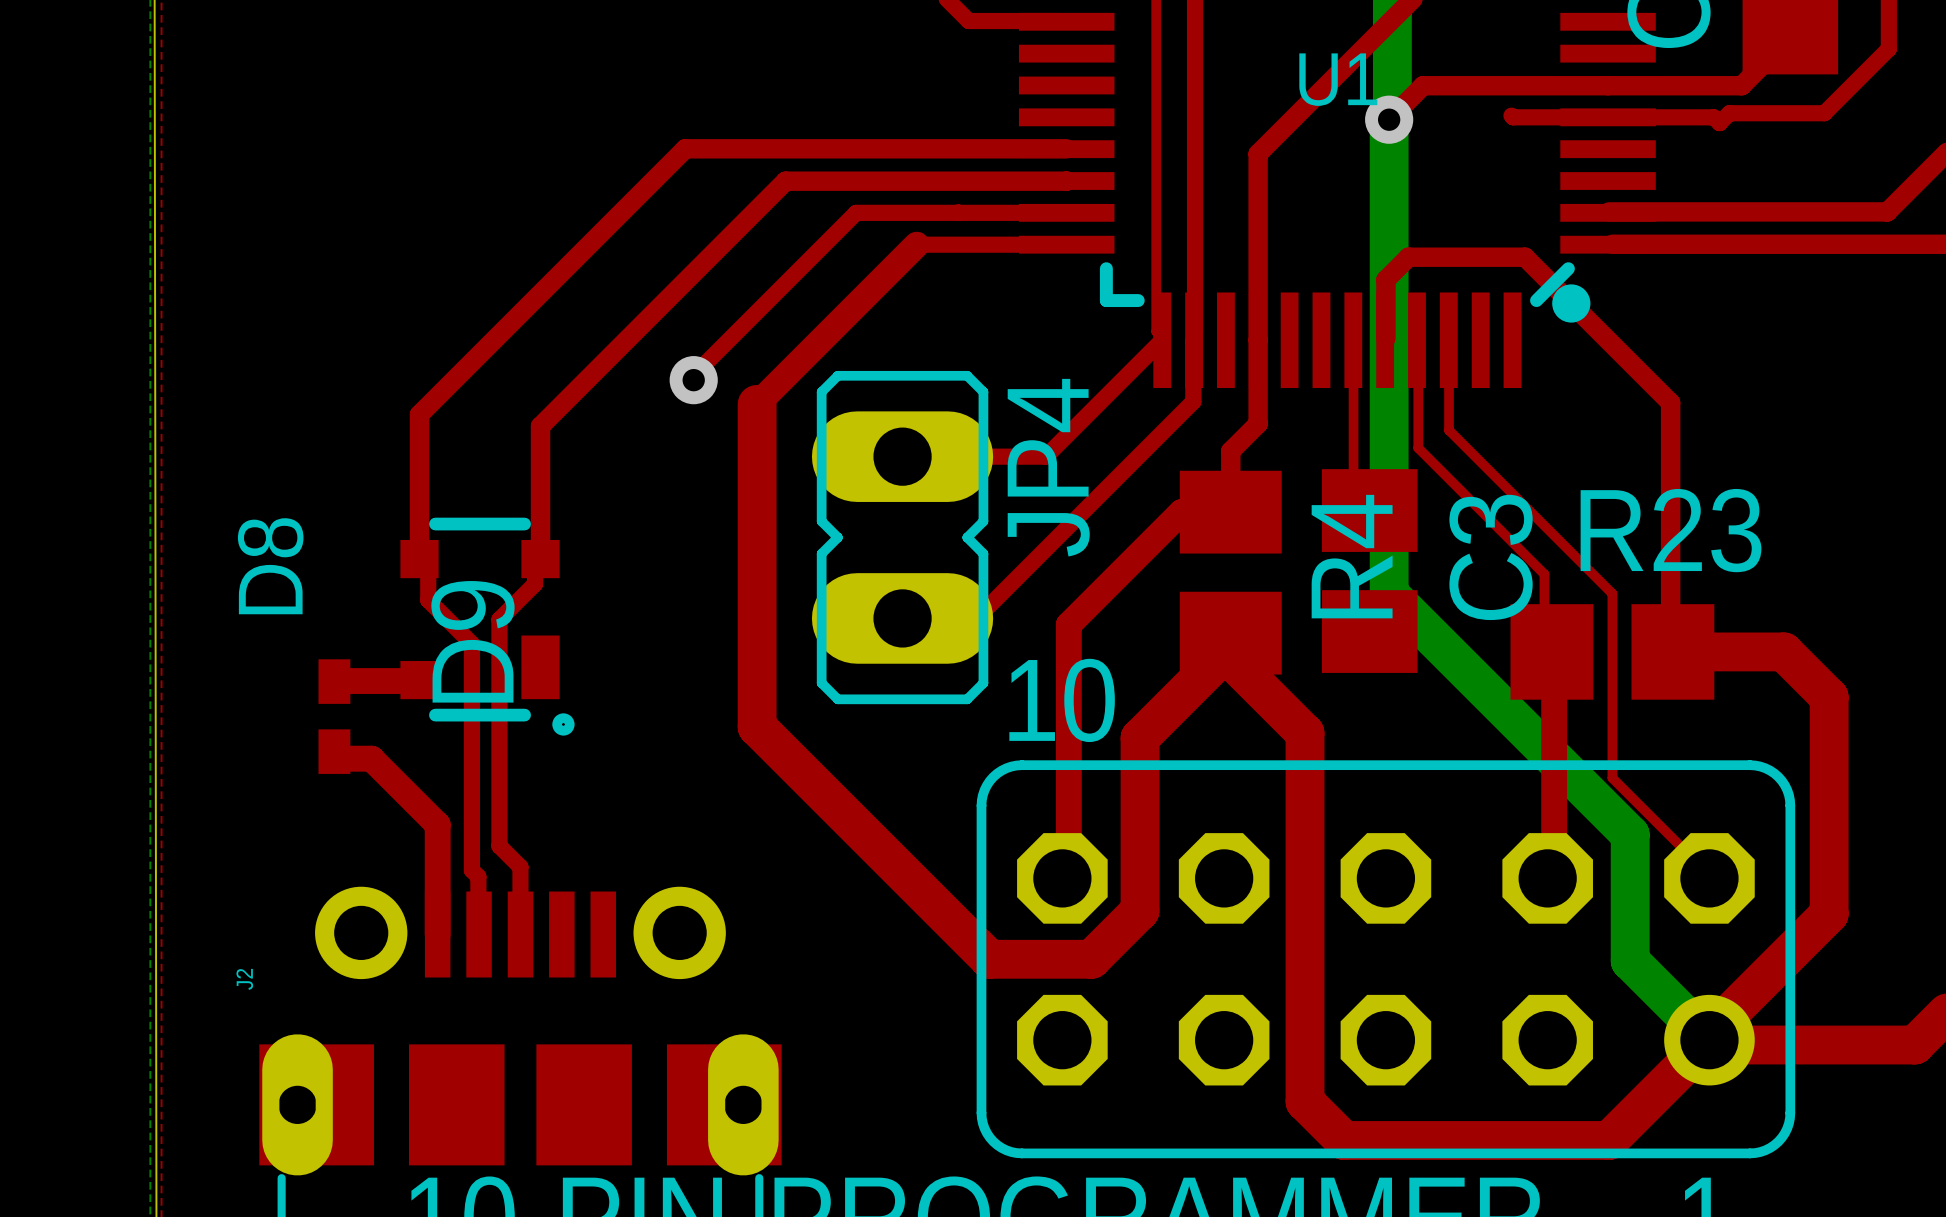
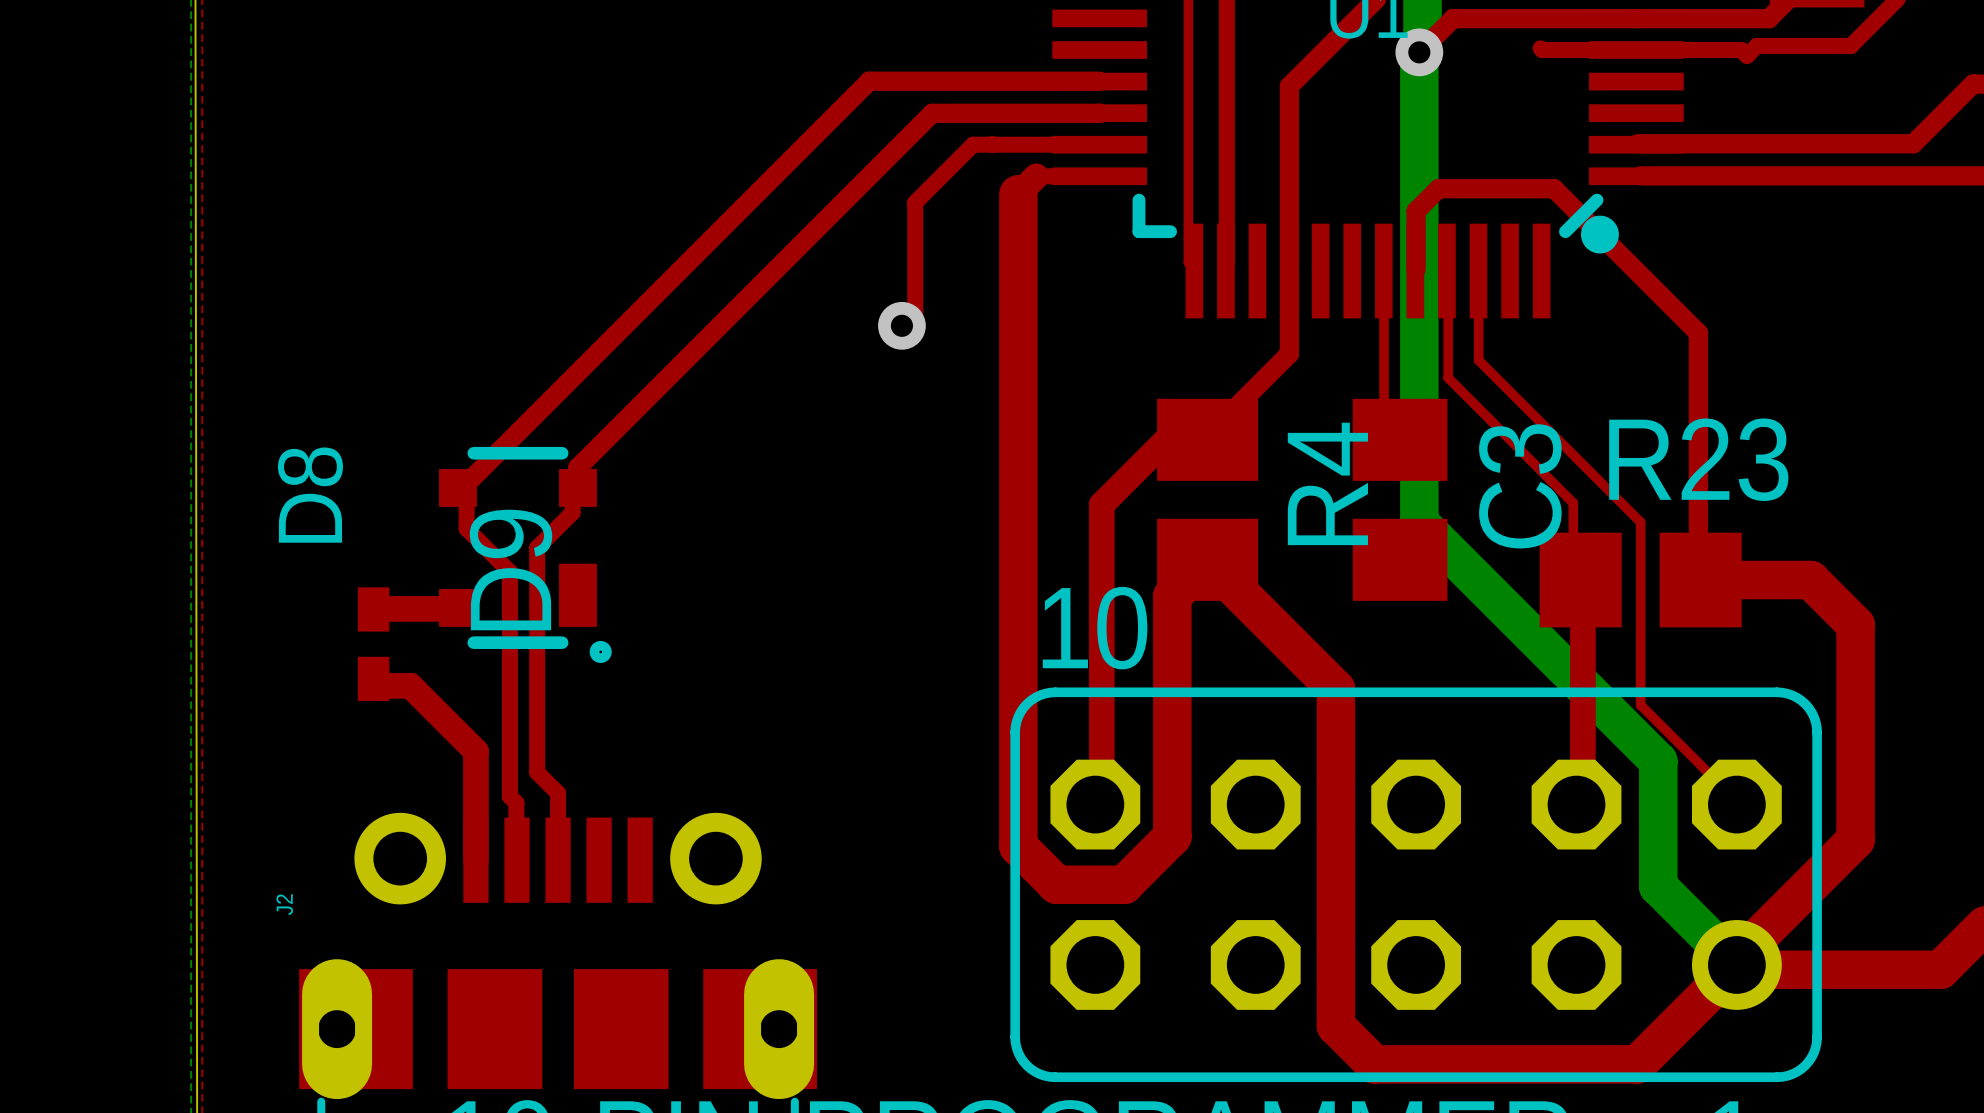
top track: (834, 148) (685, 148) (419, 414) (419, 559) -> (869, 81) (466, 483) (457, 487)
top track: (897, 181) (785, 181) (540, 426) (540, 538) -> (932, 113) (577, 467)
top track: (939, 212) (856, 212) (693, 375) (693, 380) -> (973, 144) (915, 202) (915, 312) (901, 325)
top track: (1002, 244) (916, 244) (757, 404) (757, 726) (989, 959) (1023, 959) -> (1036, 176) (1018, 194) (1018, 846) (1056, 884)
top track: (1162, 340) (1045, 456) (902, 456) -> none
top track: (1193, 341) (1193, 401) (976, 618) (902, 618) -> none
via position: (693, 380) -> (901, 325)
top track: (1230, 451) (1230, 512) (1181, 512) (1068, 624) -> (1262, 380) (1207, 435) (1207, 439) (1166, 439) (1101, 504) (1101, 553)
JP4: (902, 537) -> none
R4 position: (1230, 572) -> (1207, 499)
top track: (1230, 633) (1230, 659) (1305, 733) (1305, 761) -> none
top track: (1230, 647) (1140, 737) -> (1335, 689) (1207, 560) (1172, 596) (1172, 665)

